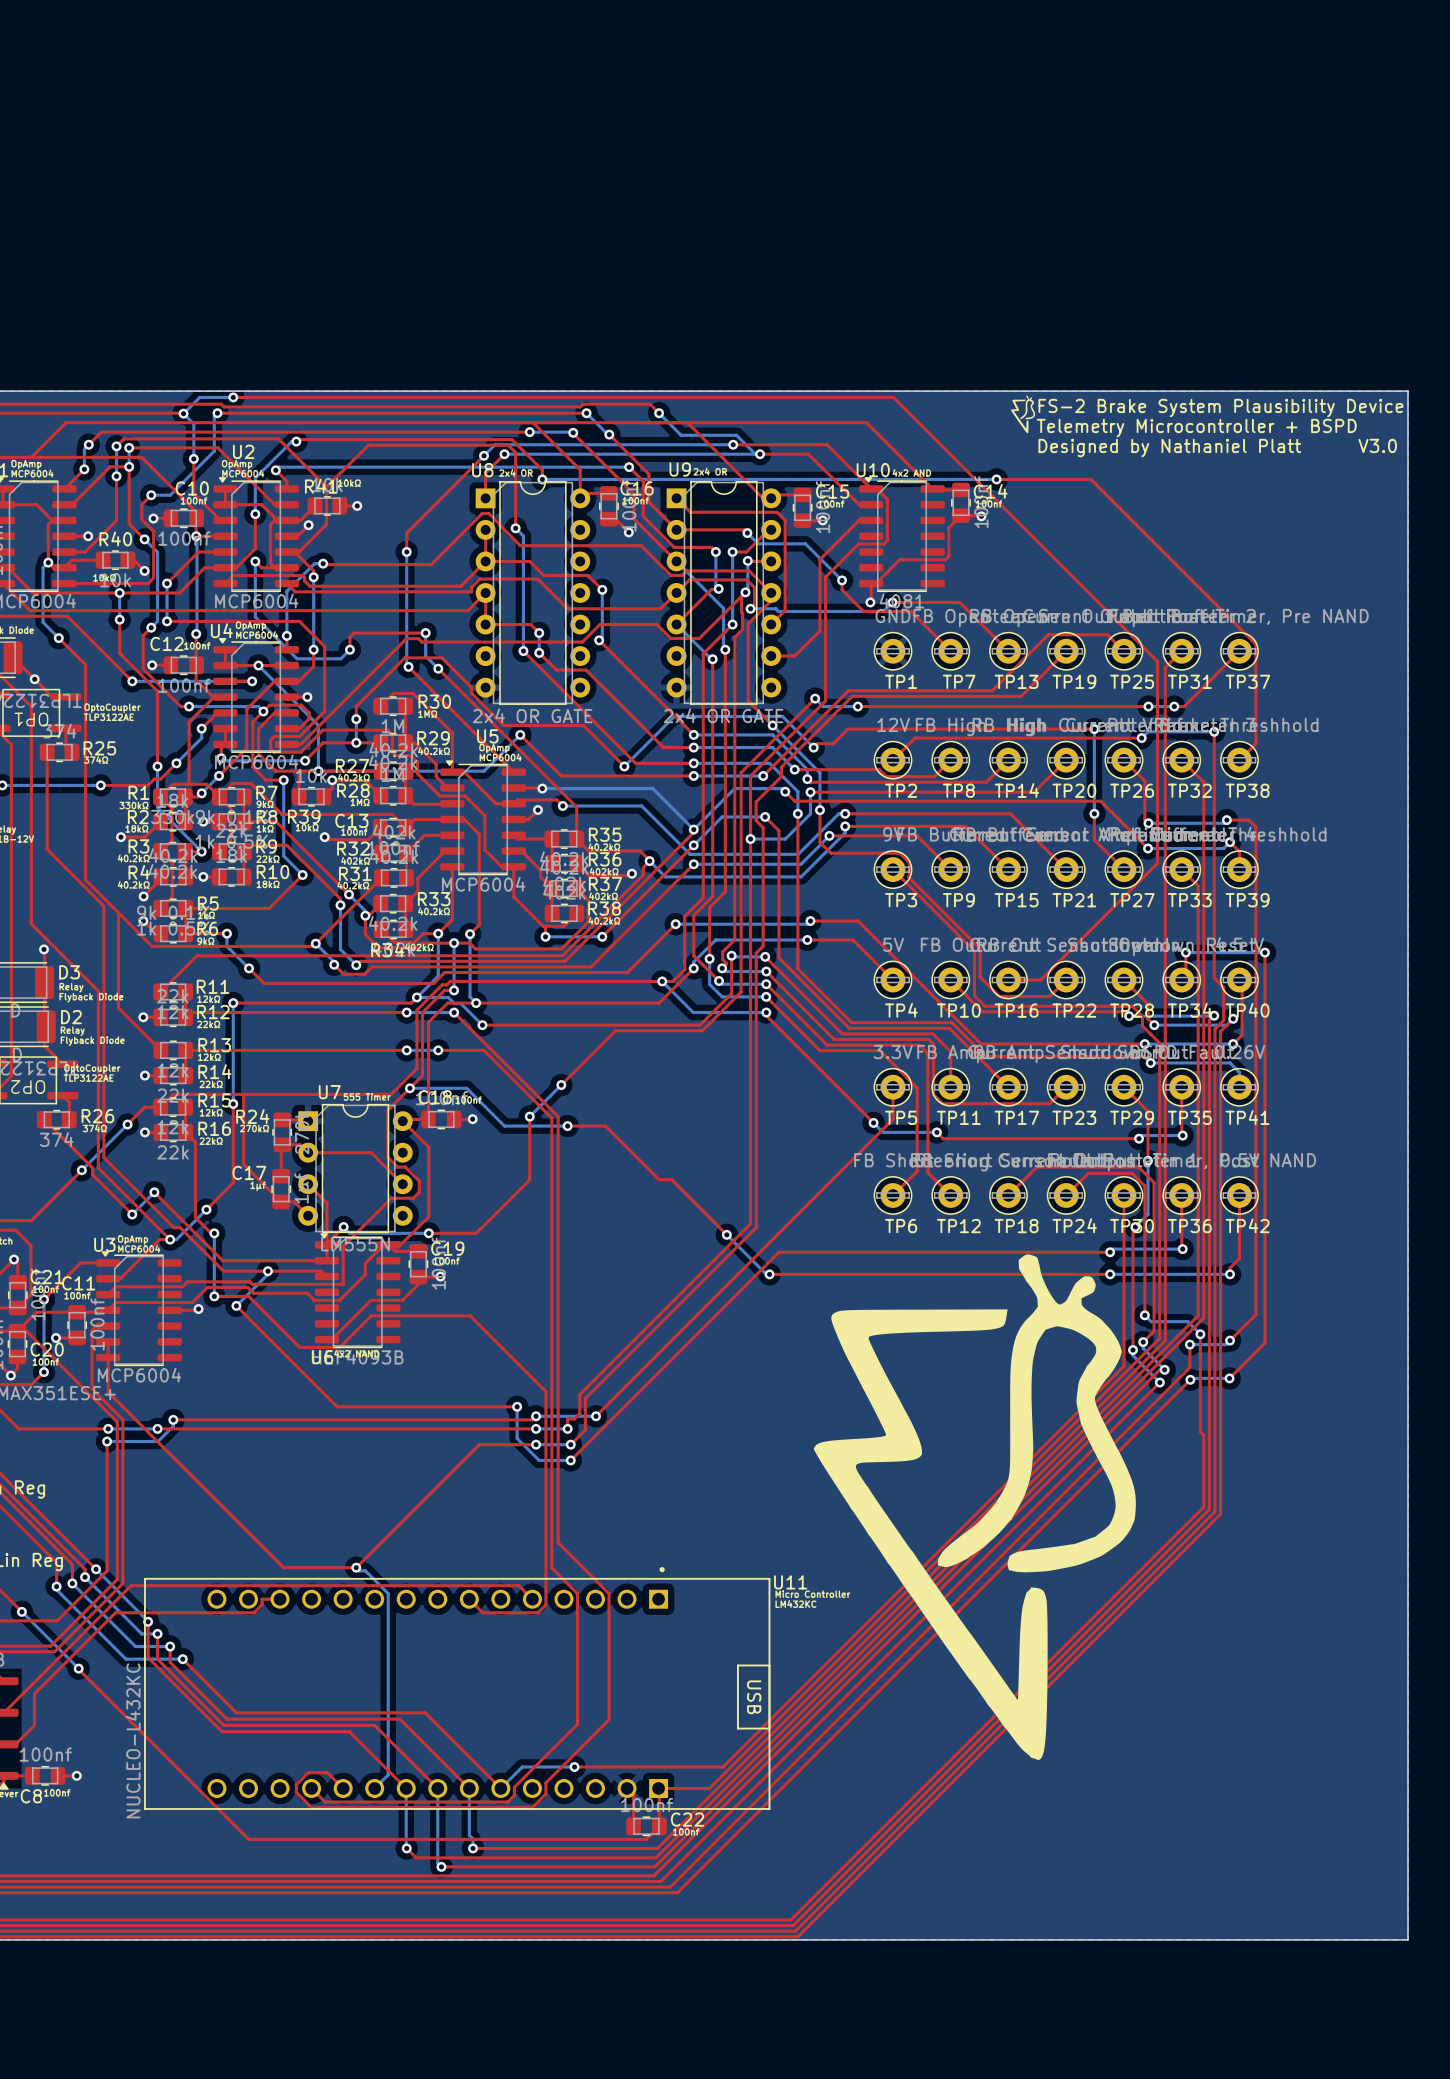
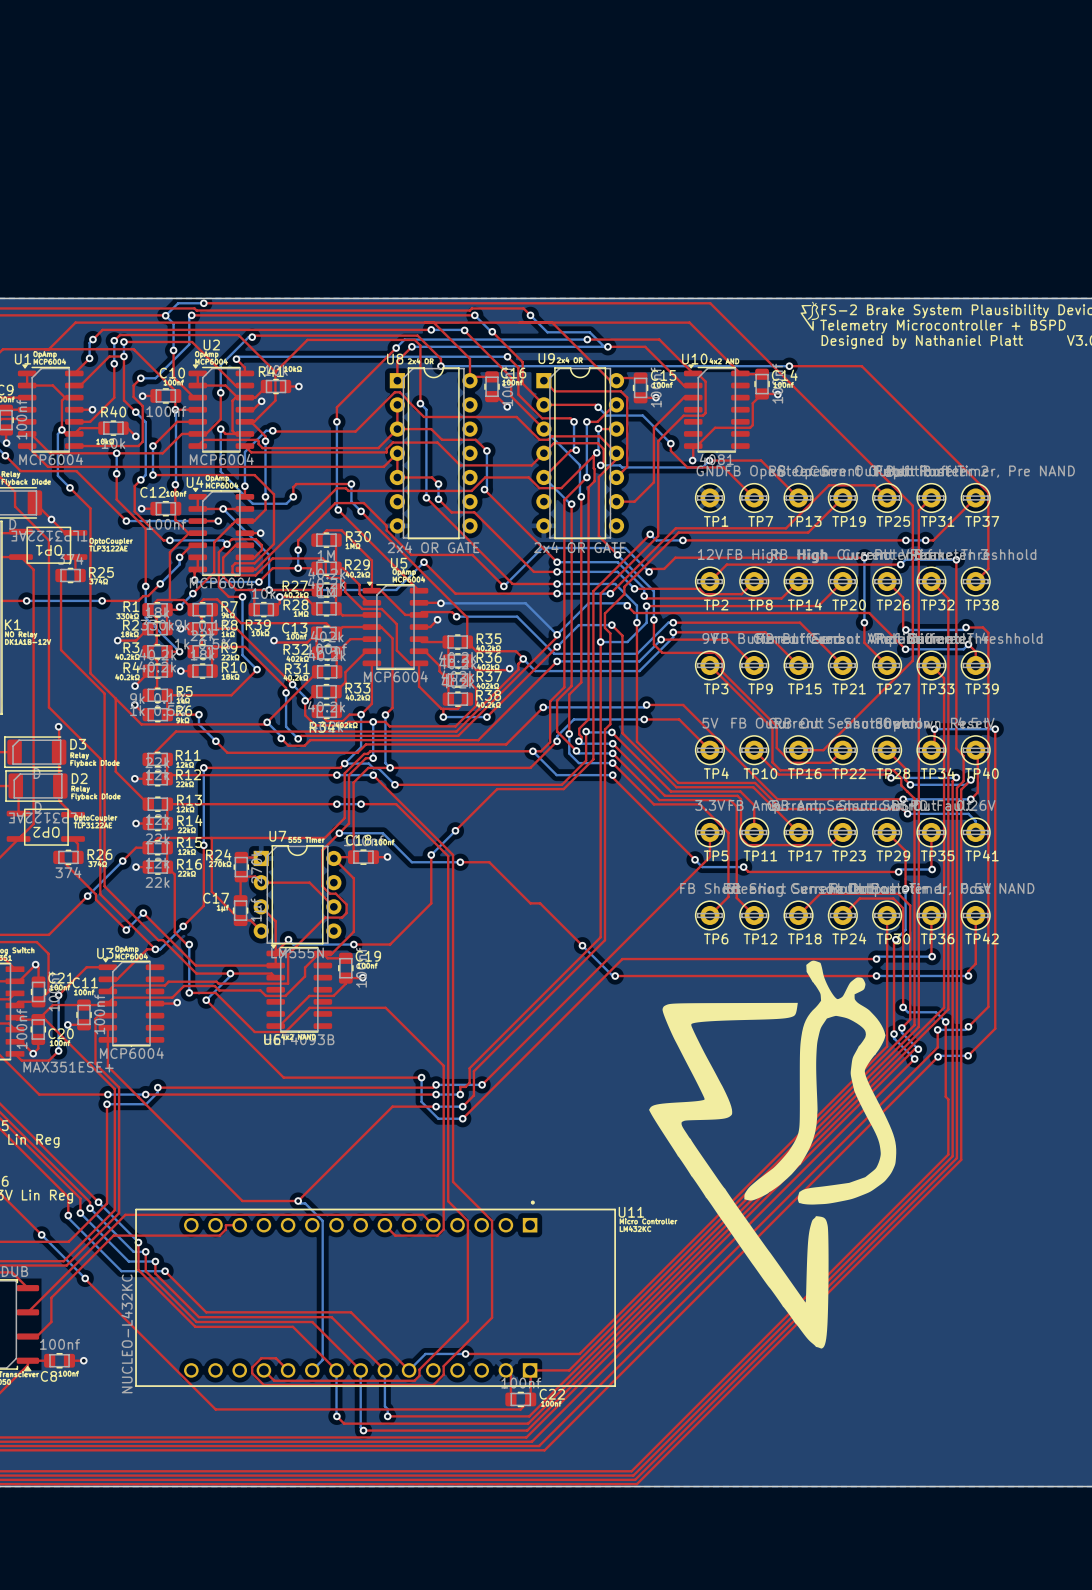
line: (737, 1665) (769, 1665) (769, 1728) (737, 1728) (737, 1665) -> none
text: USB (754, 1697) -> none

